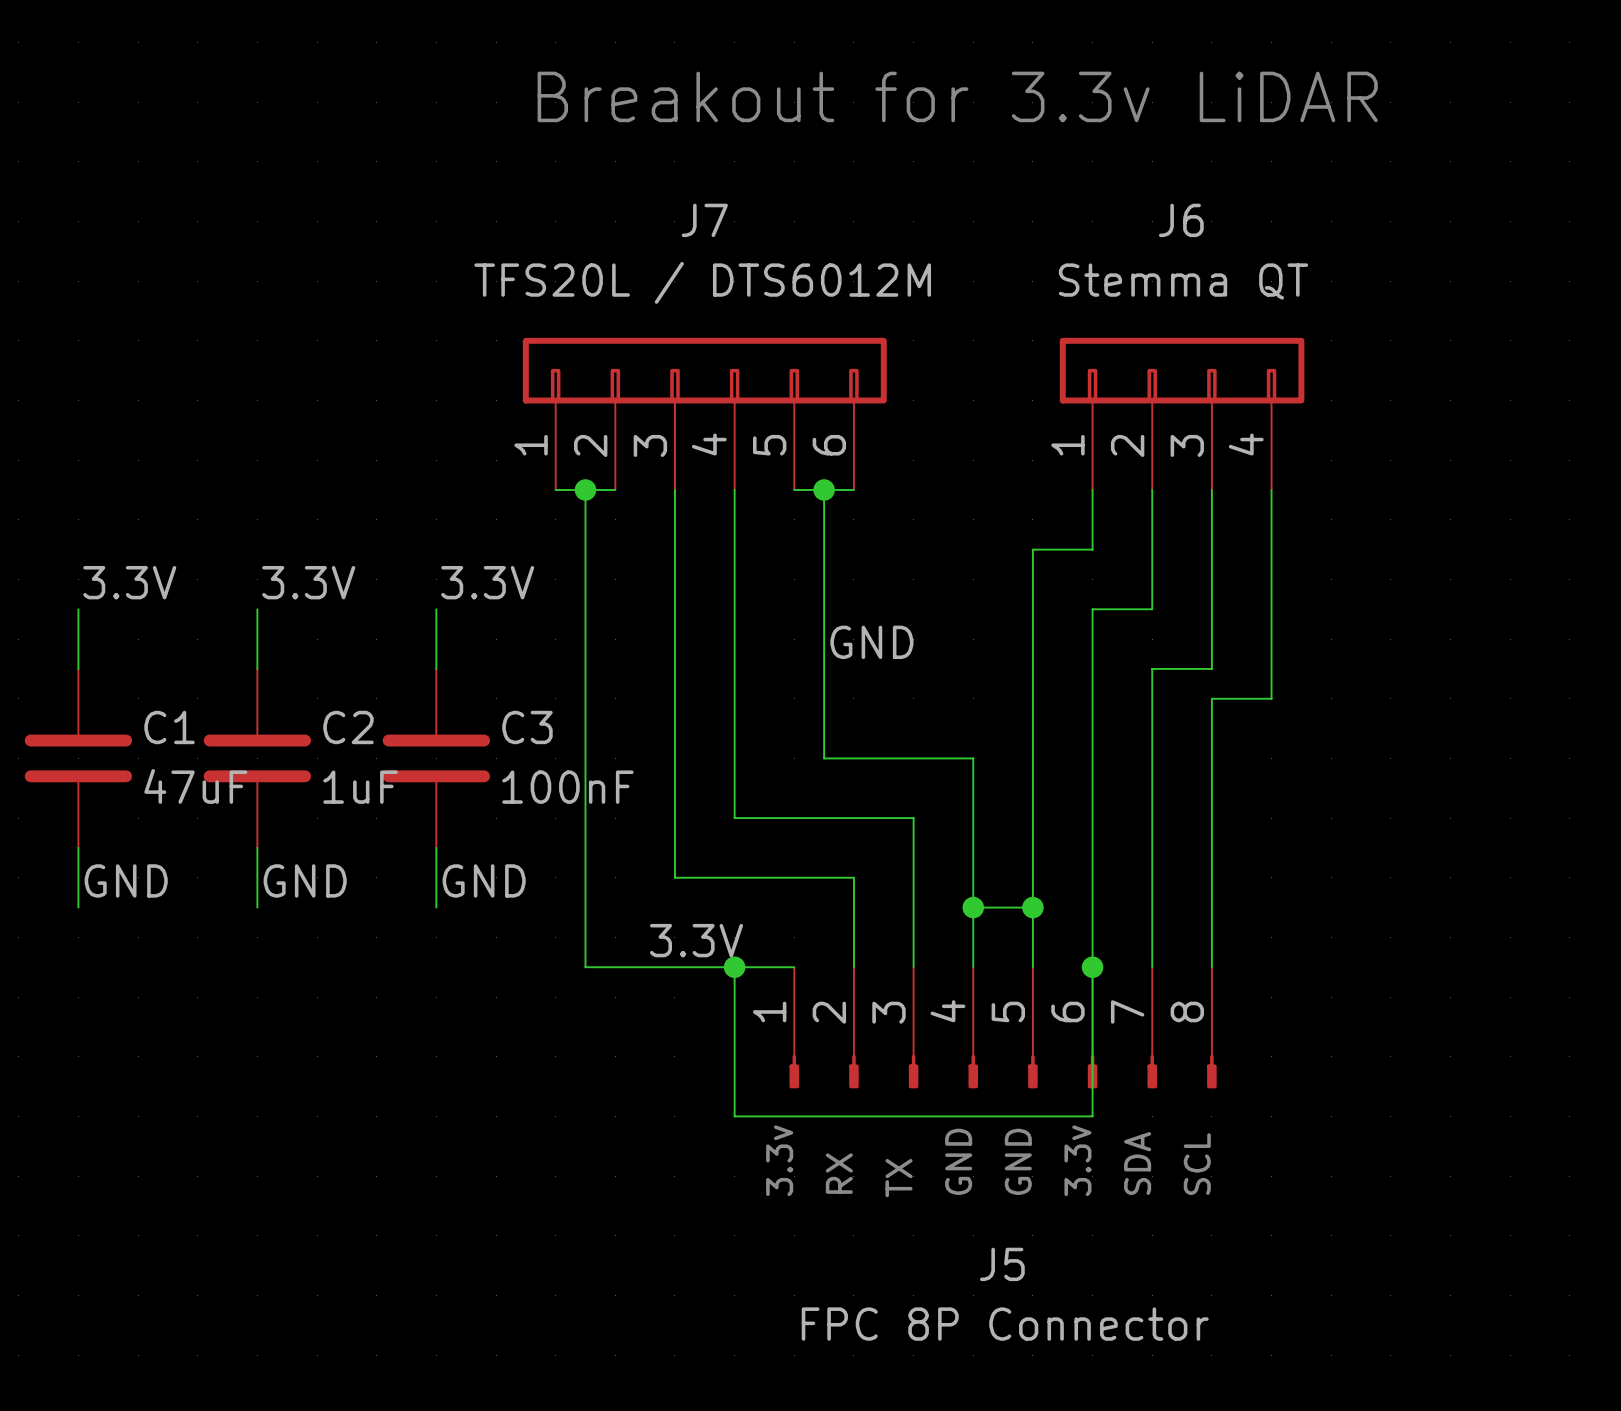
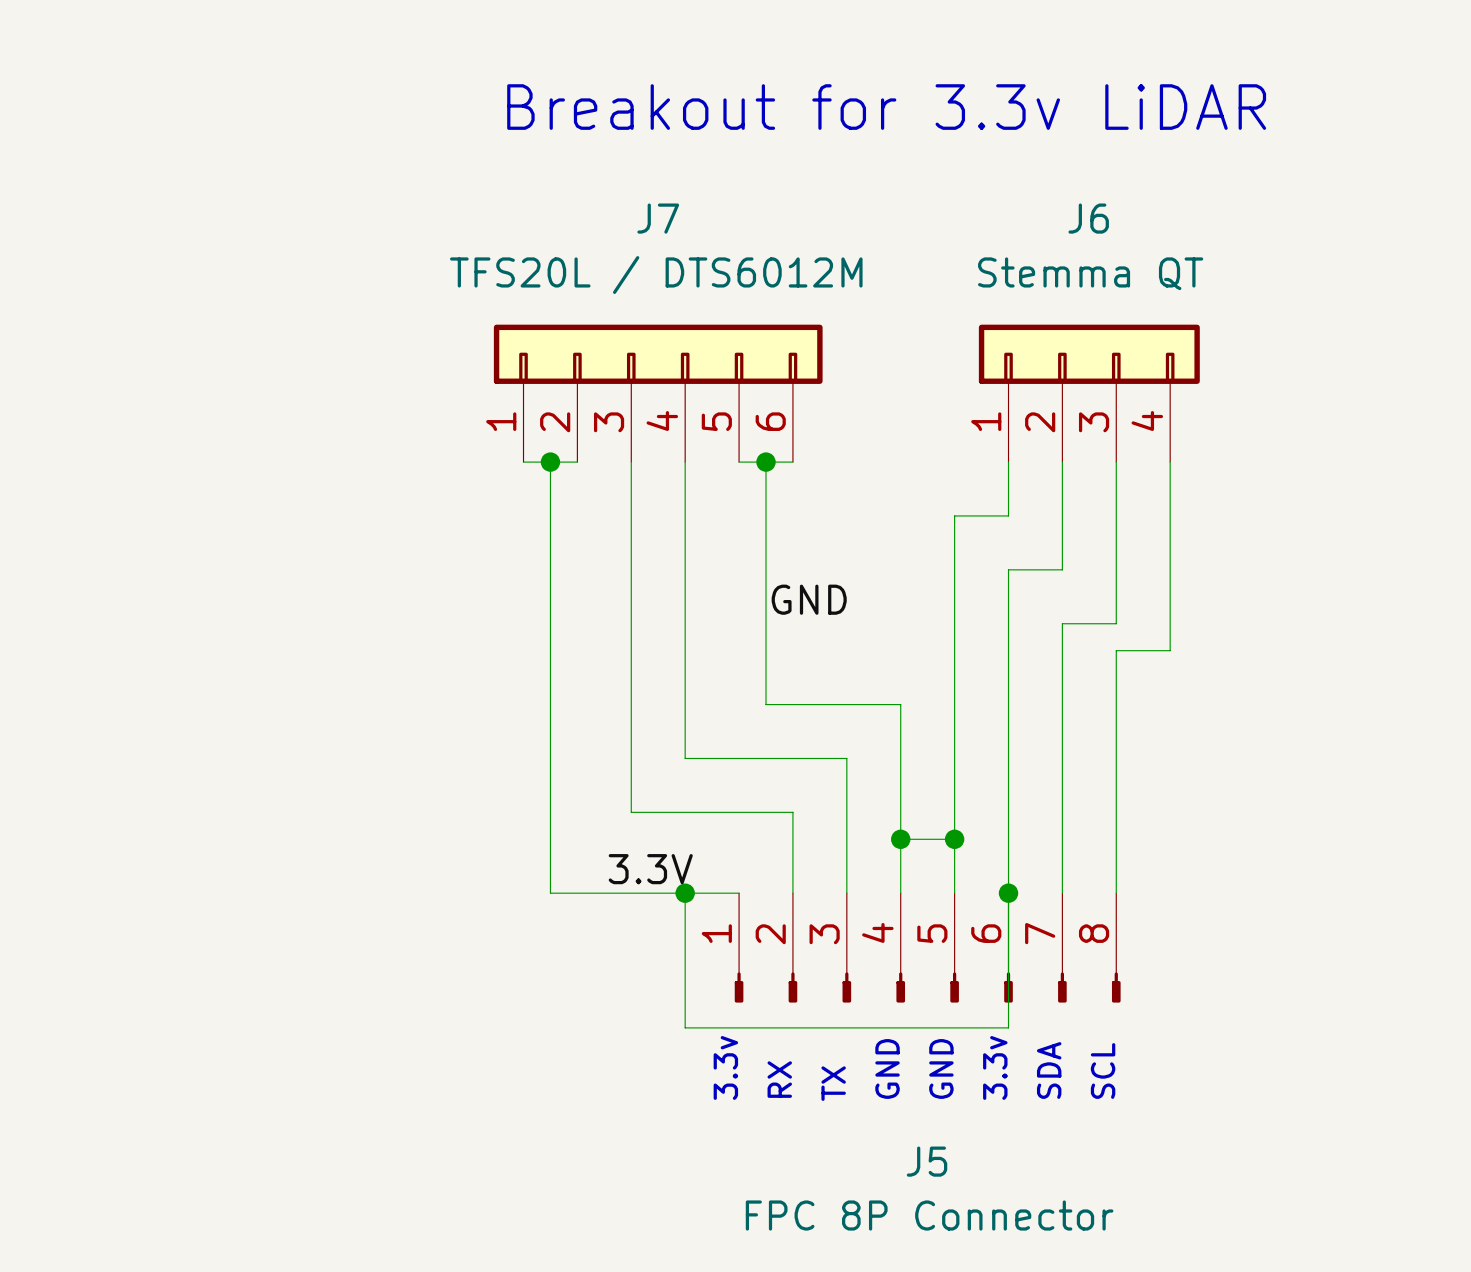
label: 3.3V (129, 582) -> none
label: 3.3V (308, 582) -> none
label: 3.3V (487, 582) -> none
wire: (78, 609) (78, 668) -> none
wire: (257, 609) (257, 668) -> none
wire: (436, 609) (436, 668) -> none
C1: 47uF (78, 758) -> none
C2: 1uF (257, 758) -> none
C3: 100nF (436, 758) -> none
wire: (78, 847) (78, 907) -> none
wire: (257, 847) (257, 907) -> none
wire: (436, 847) (436, 907) -> none
label: GND (126, 880) -> none
label: GND (305, 880) -> none
label: GND (484, 880) -> none

